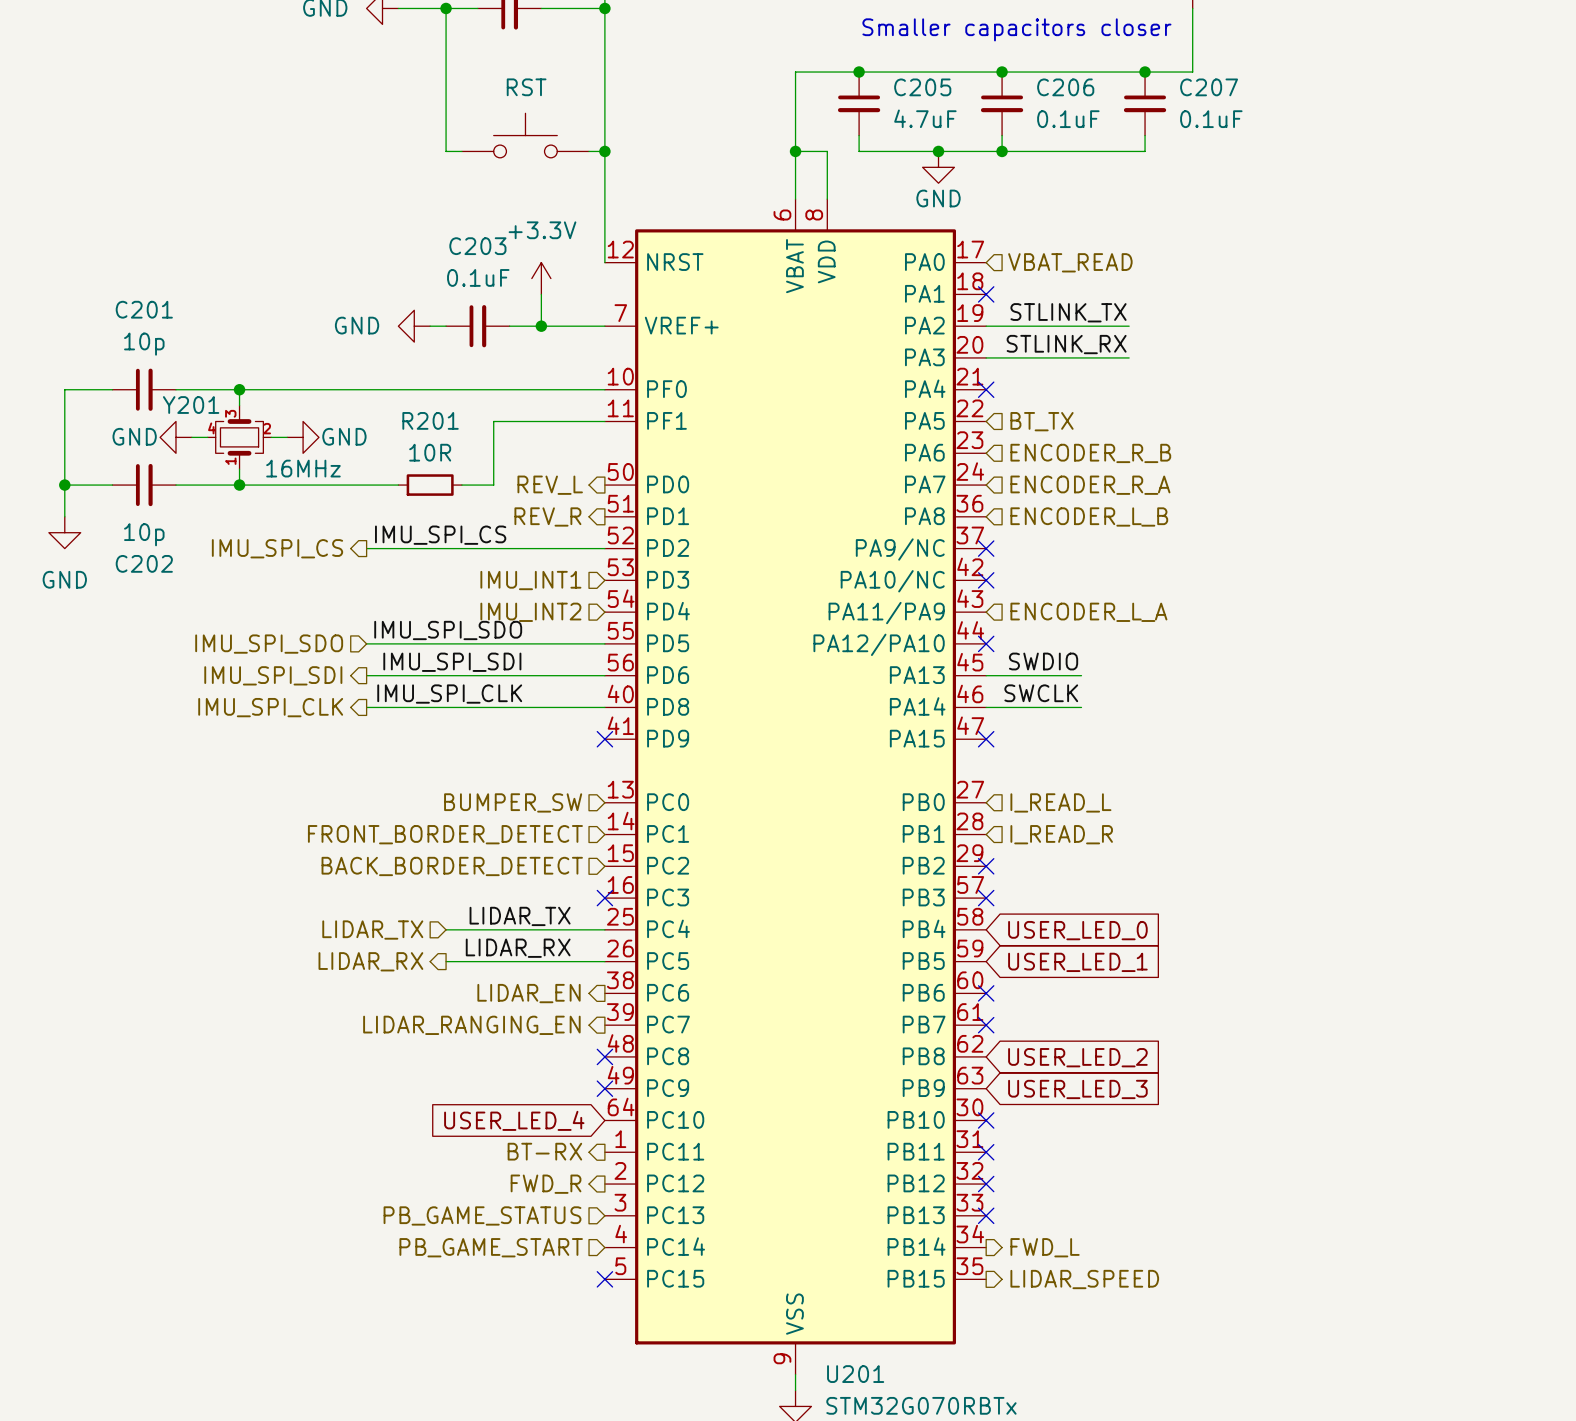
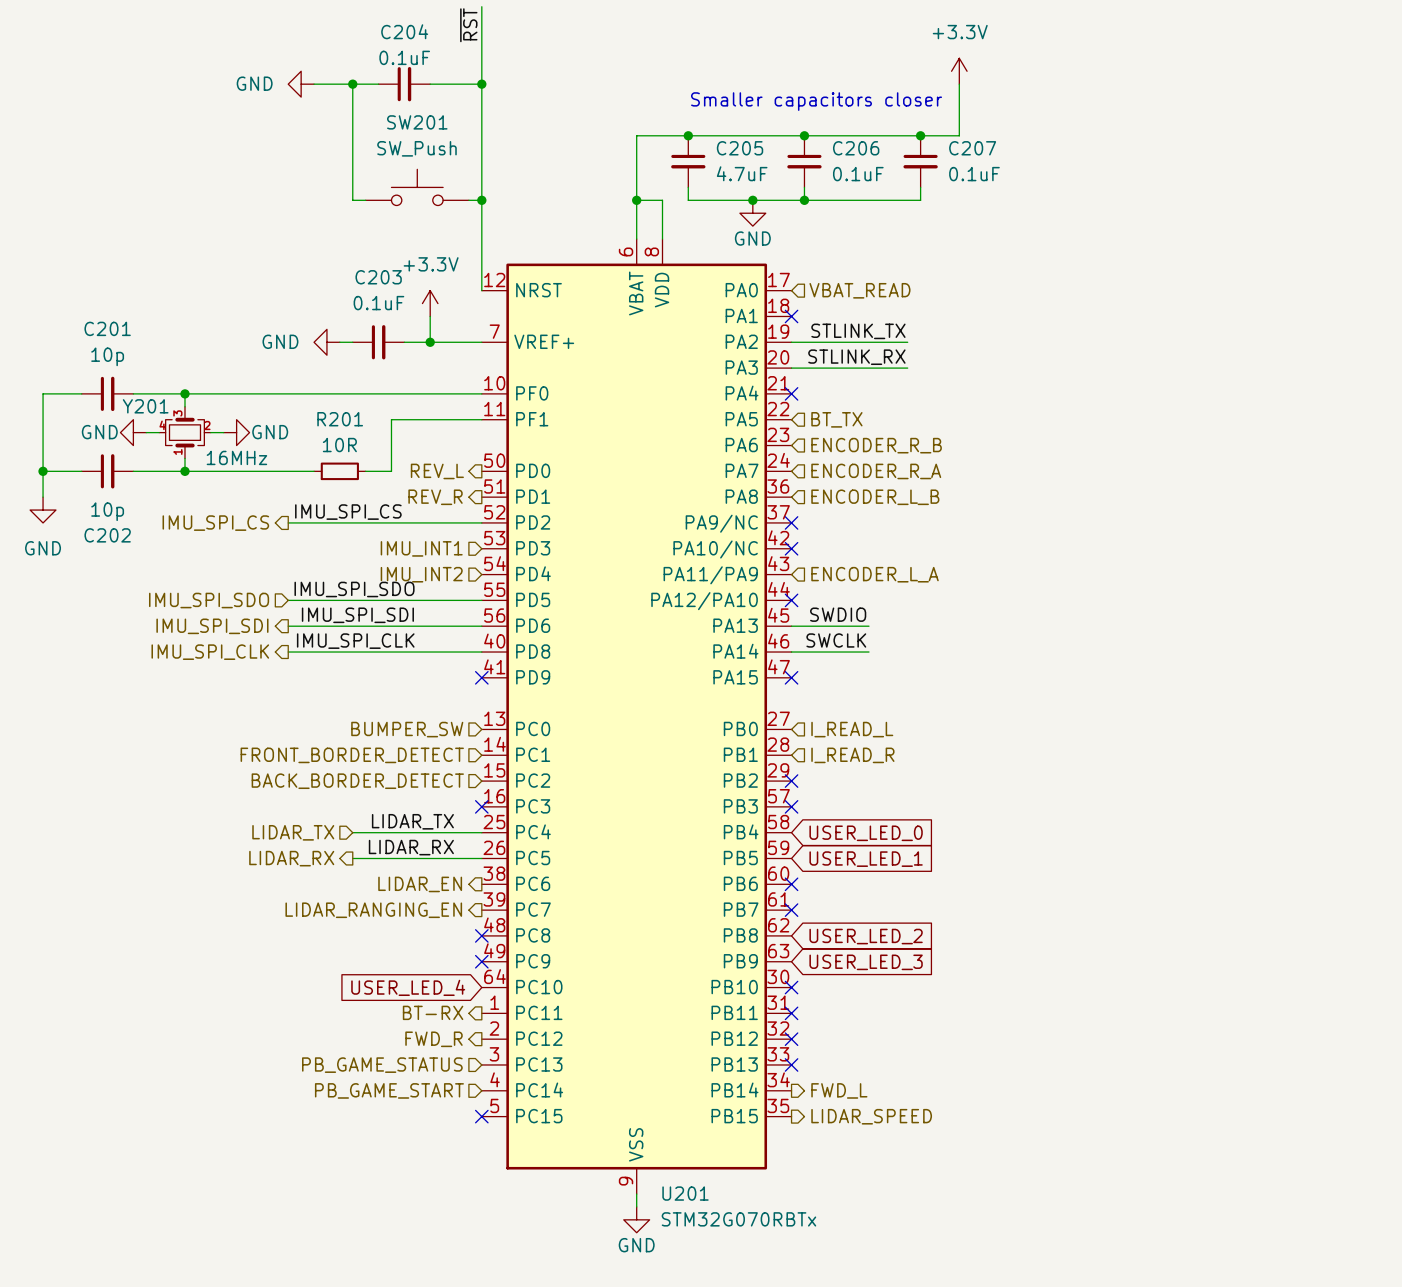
SW201 name: none -> SW201 (417, 122)
SW201 value: RST (526, 87) -> SW_Push (416, 148)

